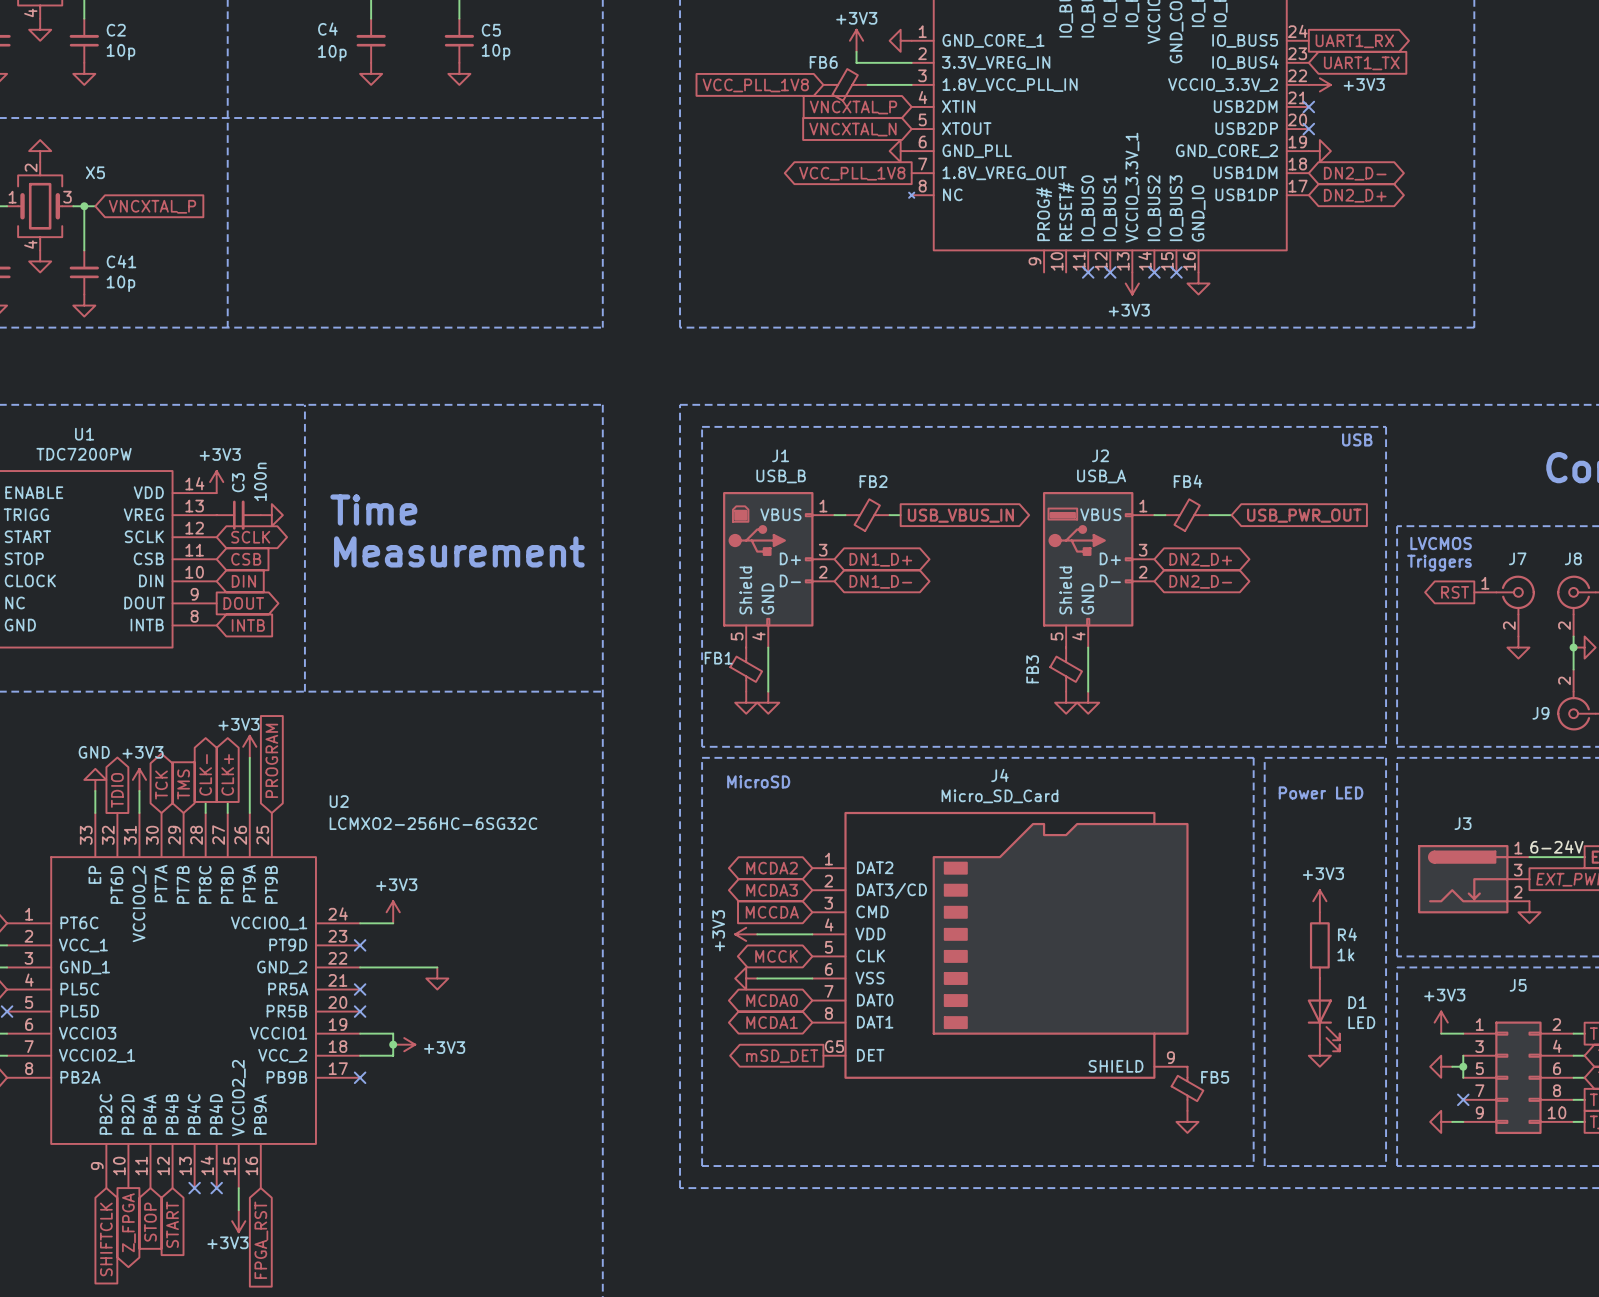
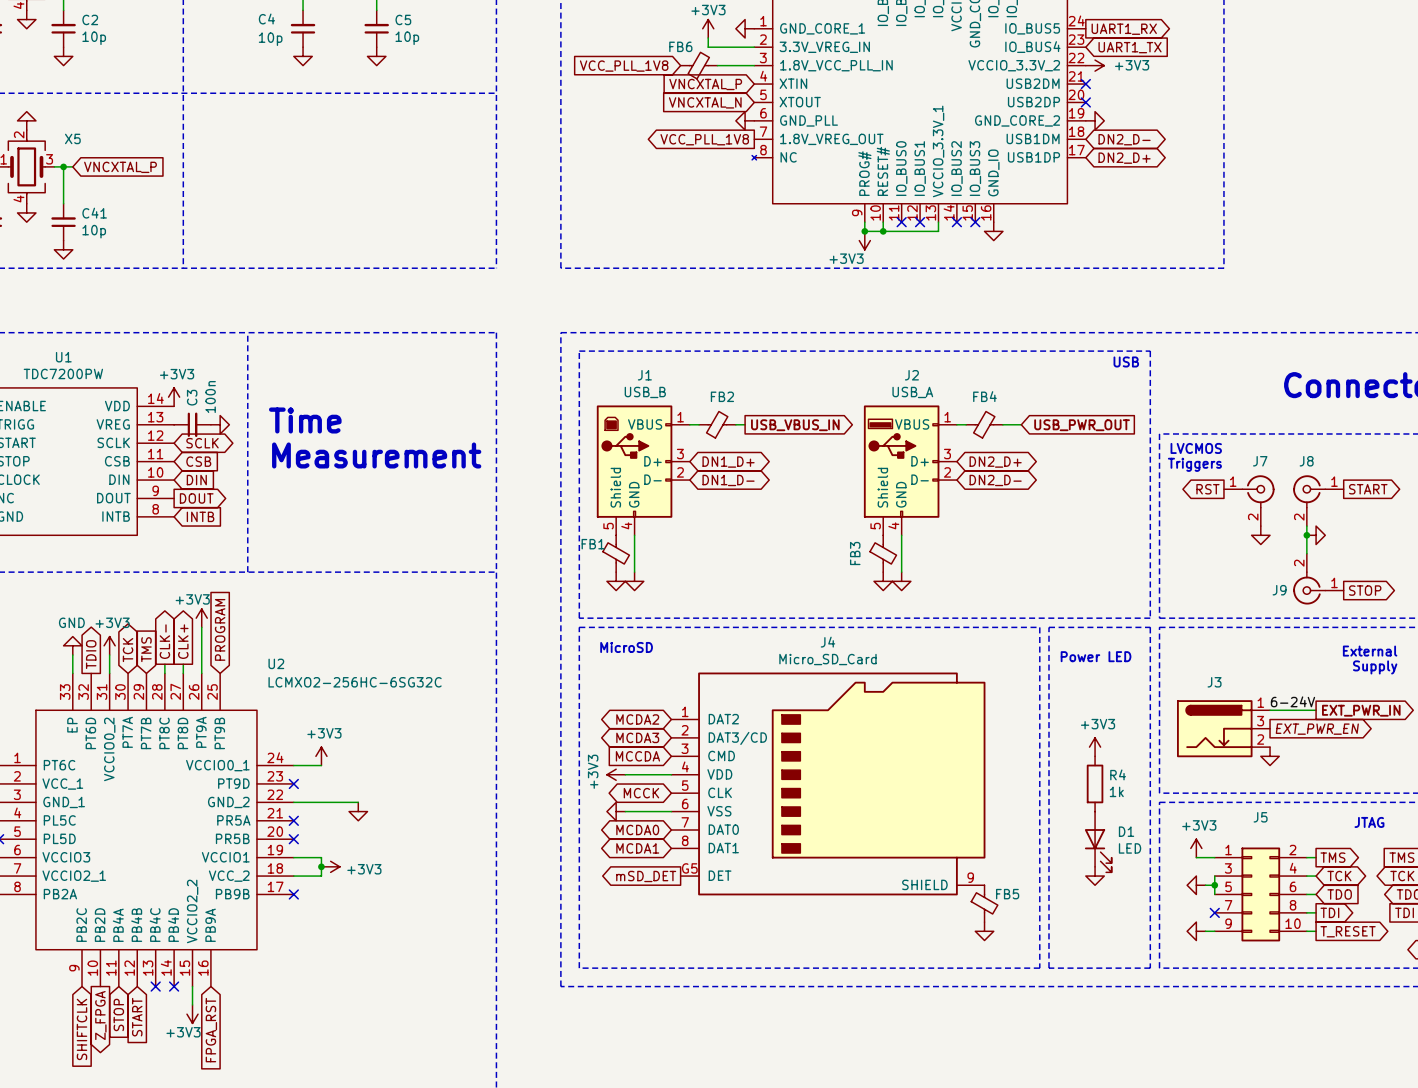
wire: none -> (864, 222) (864, 231) (938, 231) (938, 222)
wire: none -> (883, 222) (883, 231)
junction: none -> (864, 231)
junction: none -> (883, 231)
power symbol position: +3V3 (1132, 283) -> +3V3 (864, 240)
power symbol text position: +3V3 (1129, 310) -> +3V3 (846, 258)

